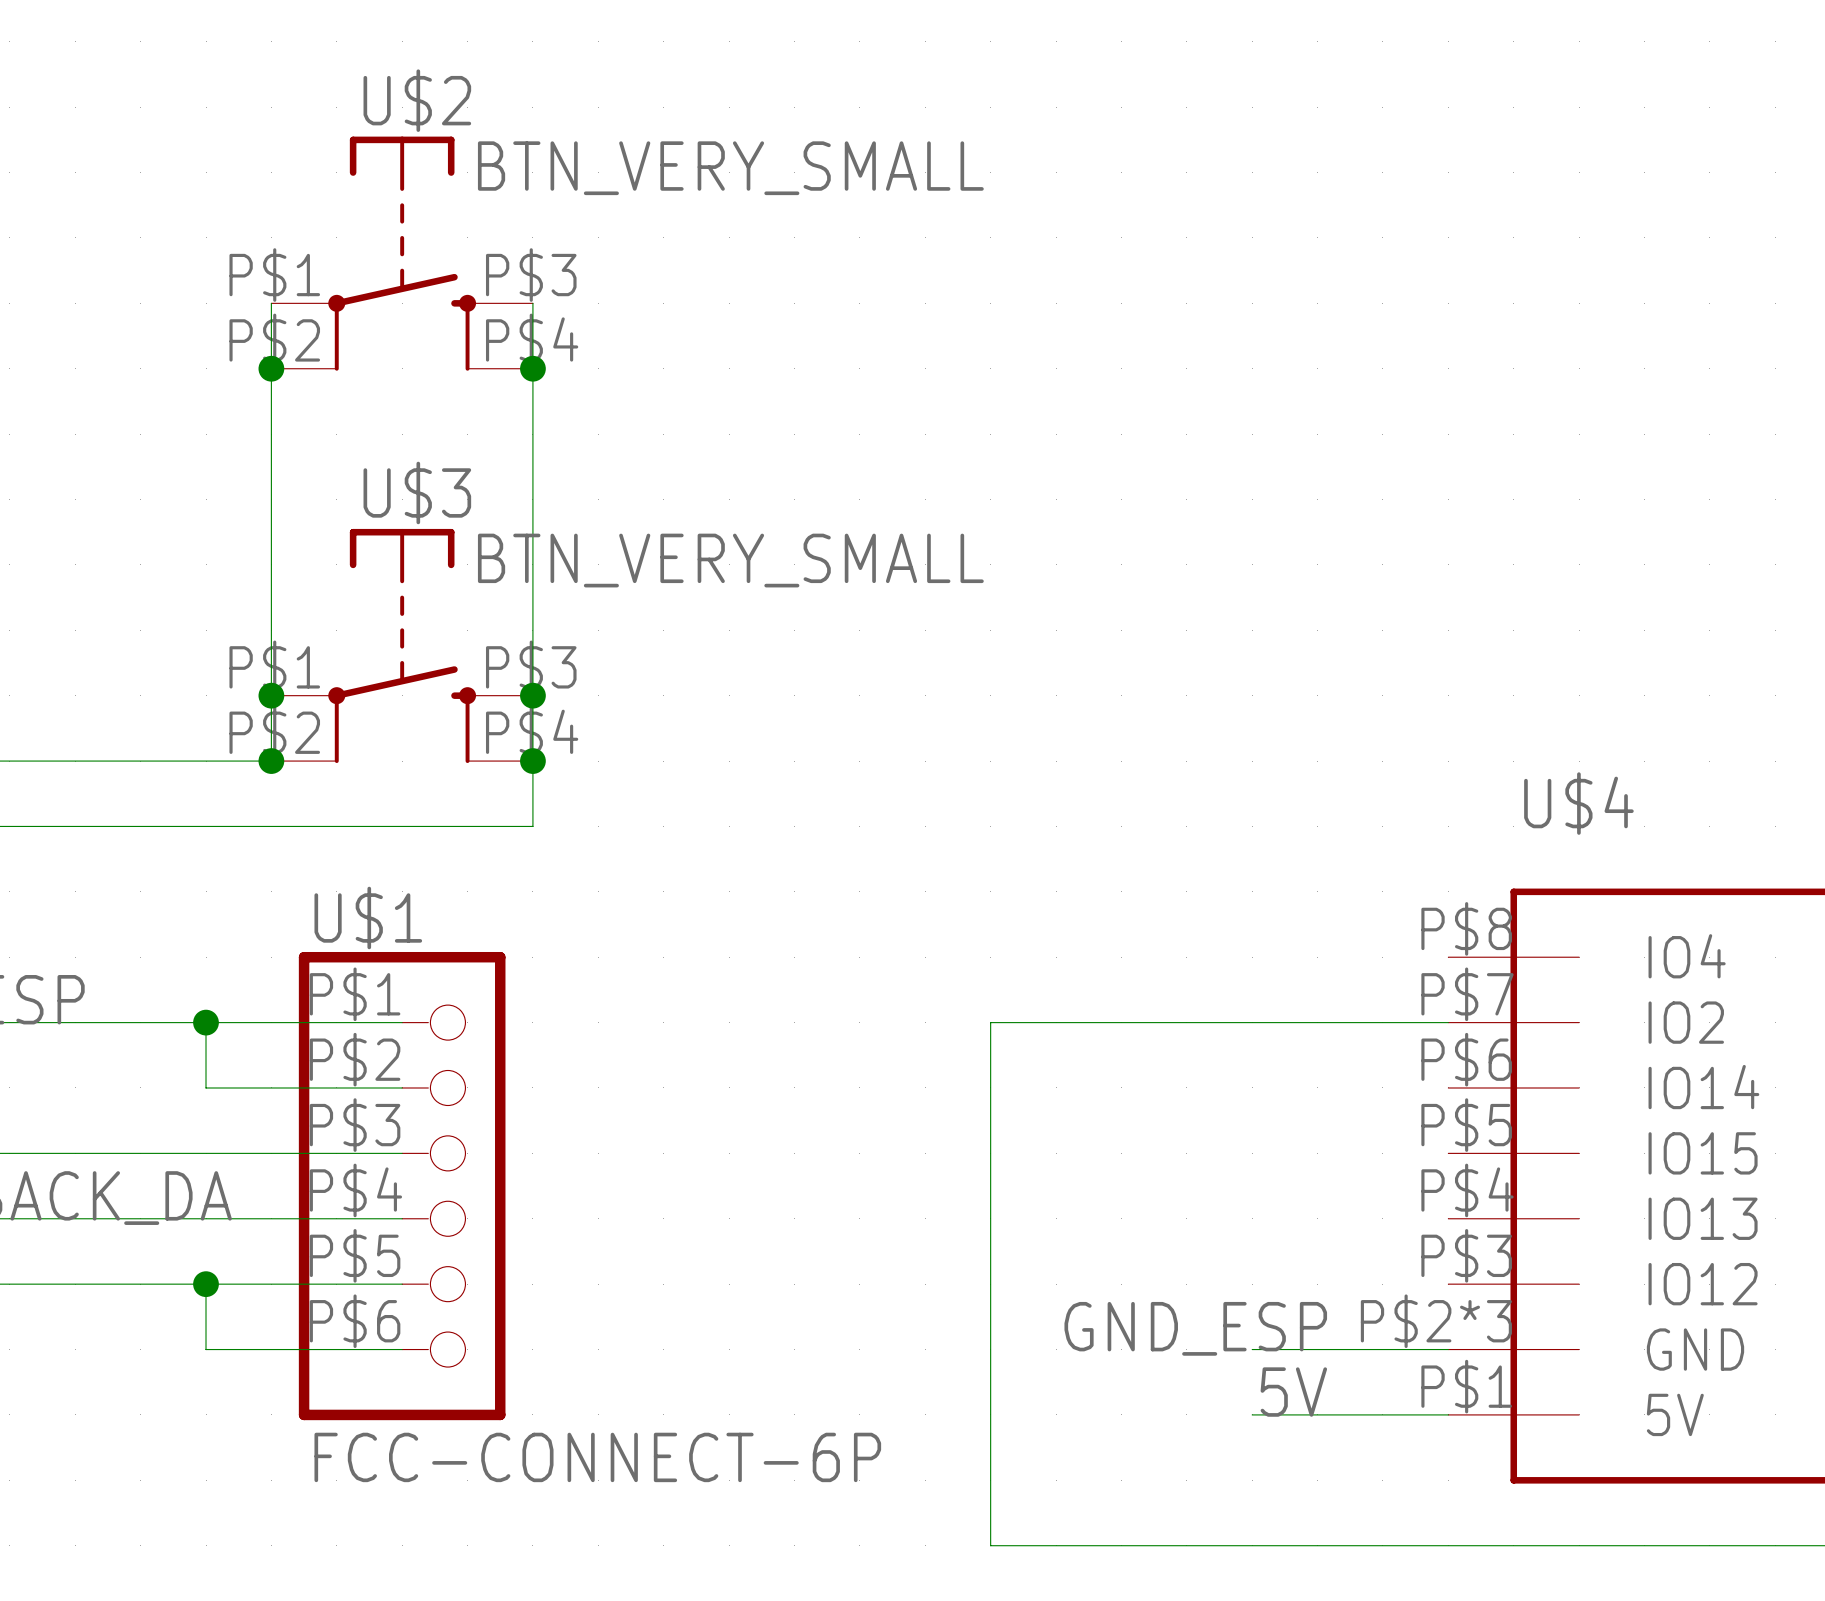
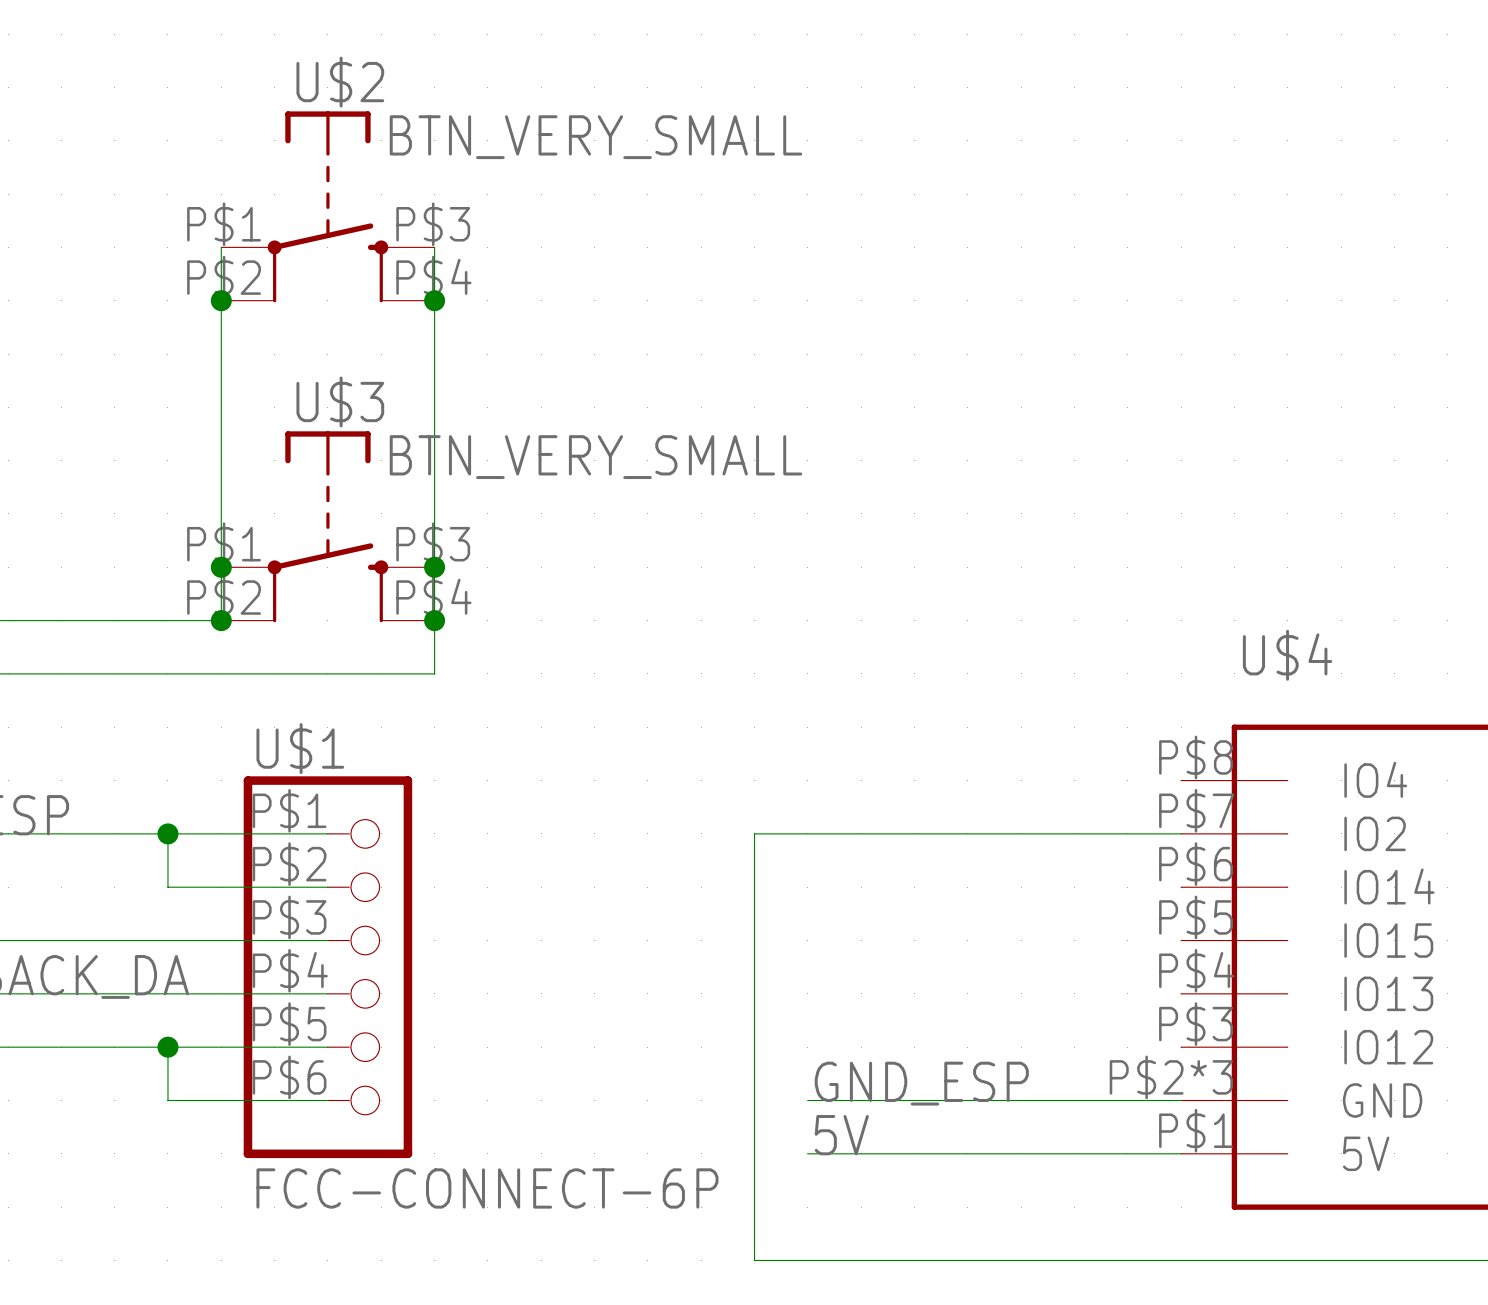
wire: (990, 1022) (990, 1545) -> (807, 833) (754, 833) (754, 1260) (807, 1260)
label position: GND_ESP (1195, 1328) -> GND_ESP (921, 1083)
wire: none -> (807, 1100) (1021, 1100)
label position: 5V (1293, 1392) -> 5V (841, 1135)
wire: none -> (807, 1153) (1021, 1153)

